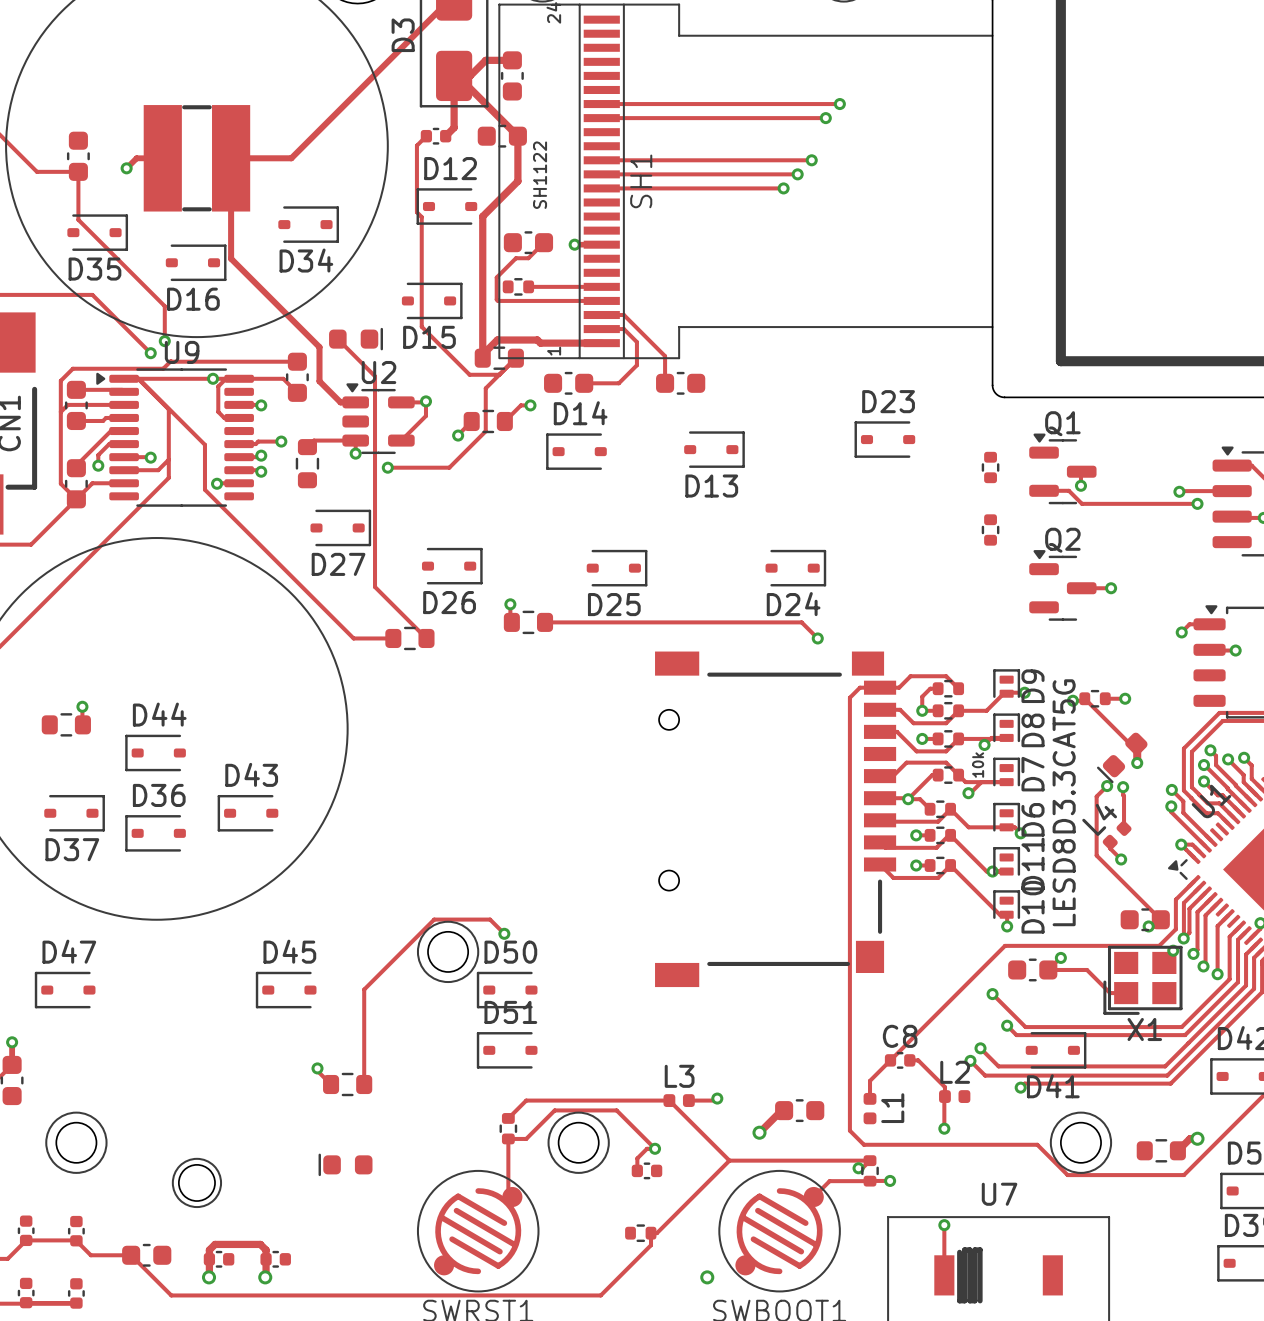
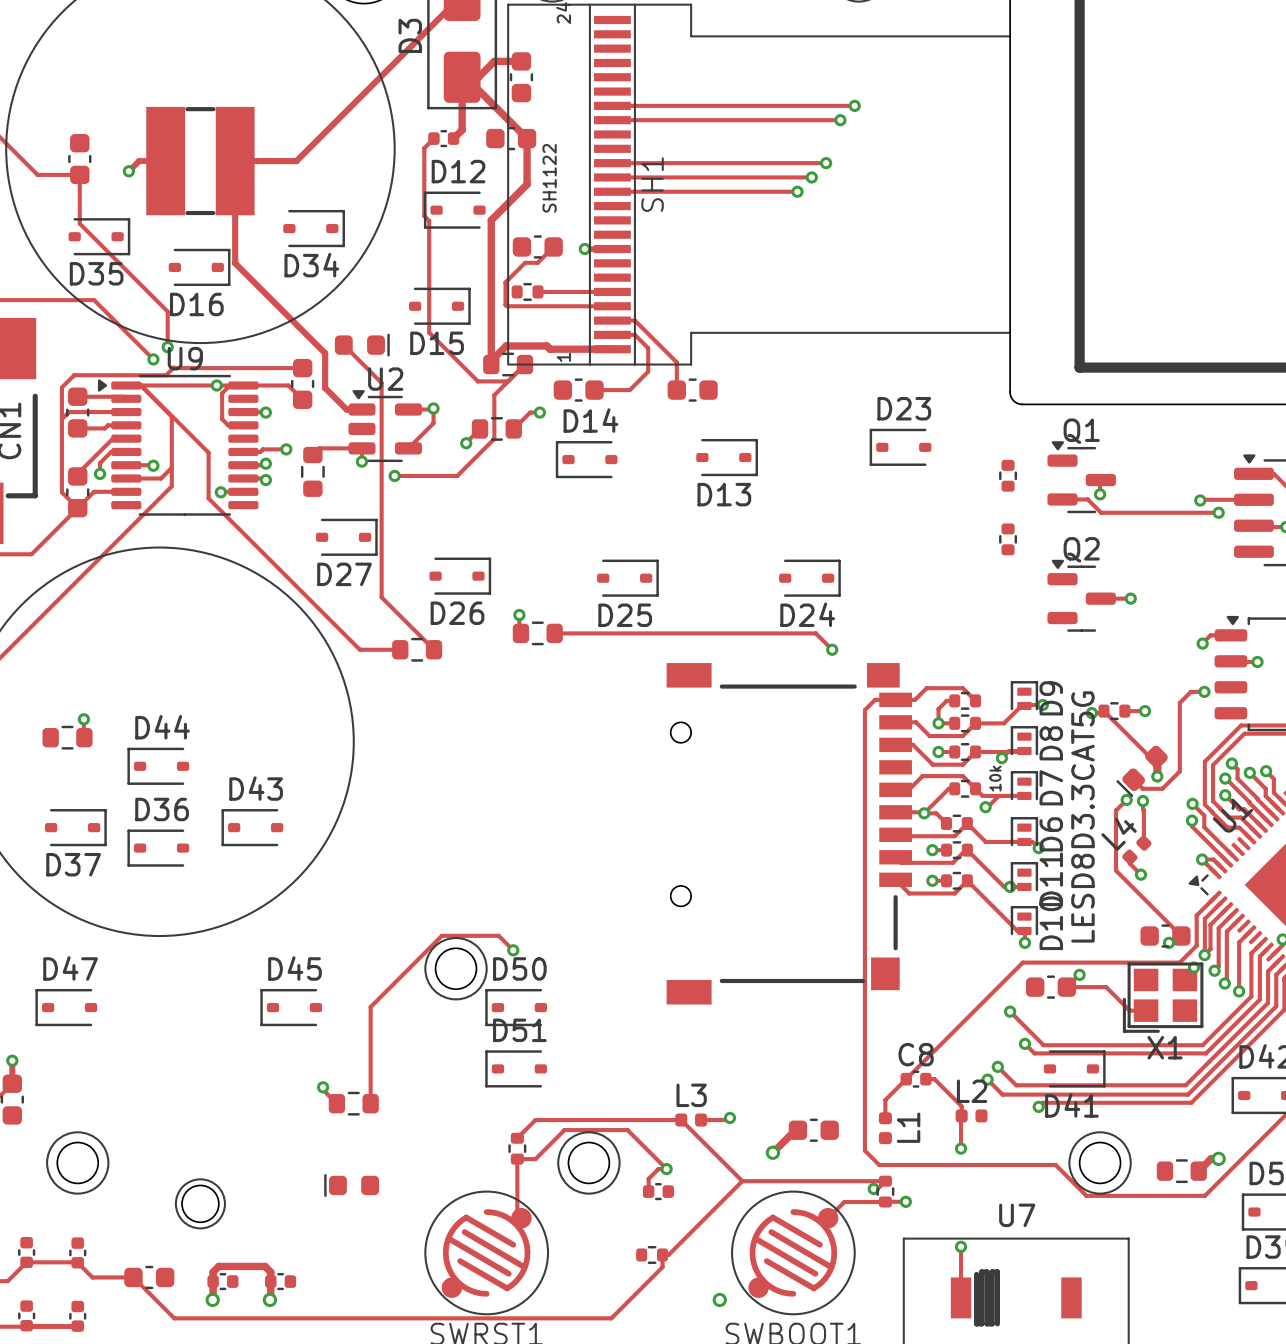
track: none -> (1204, 691) (1190, 691) (1179, 702) (1179, 771) (1162, 788) (1142, 788) (1133, 779)
via: none -> (1204, 691)

